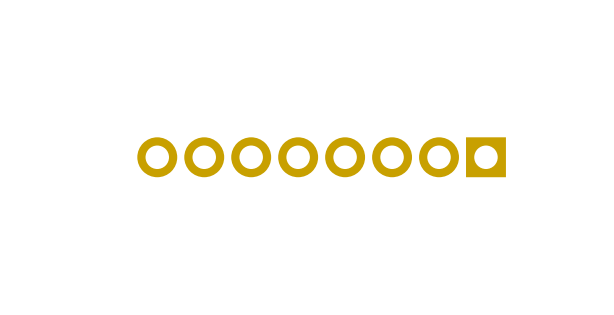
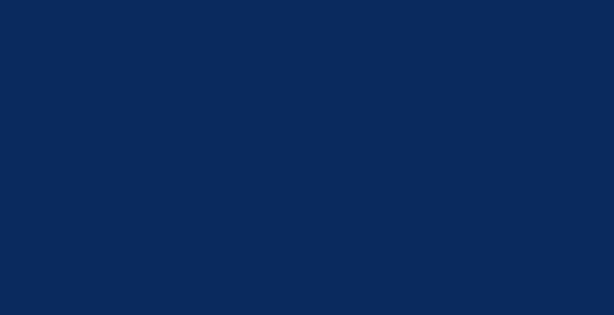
part: (321, 157) -> none

